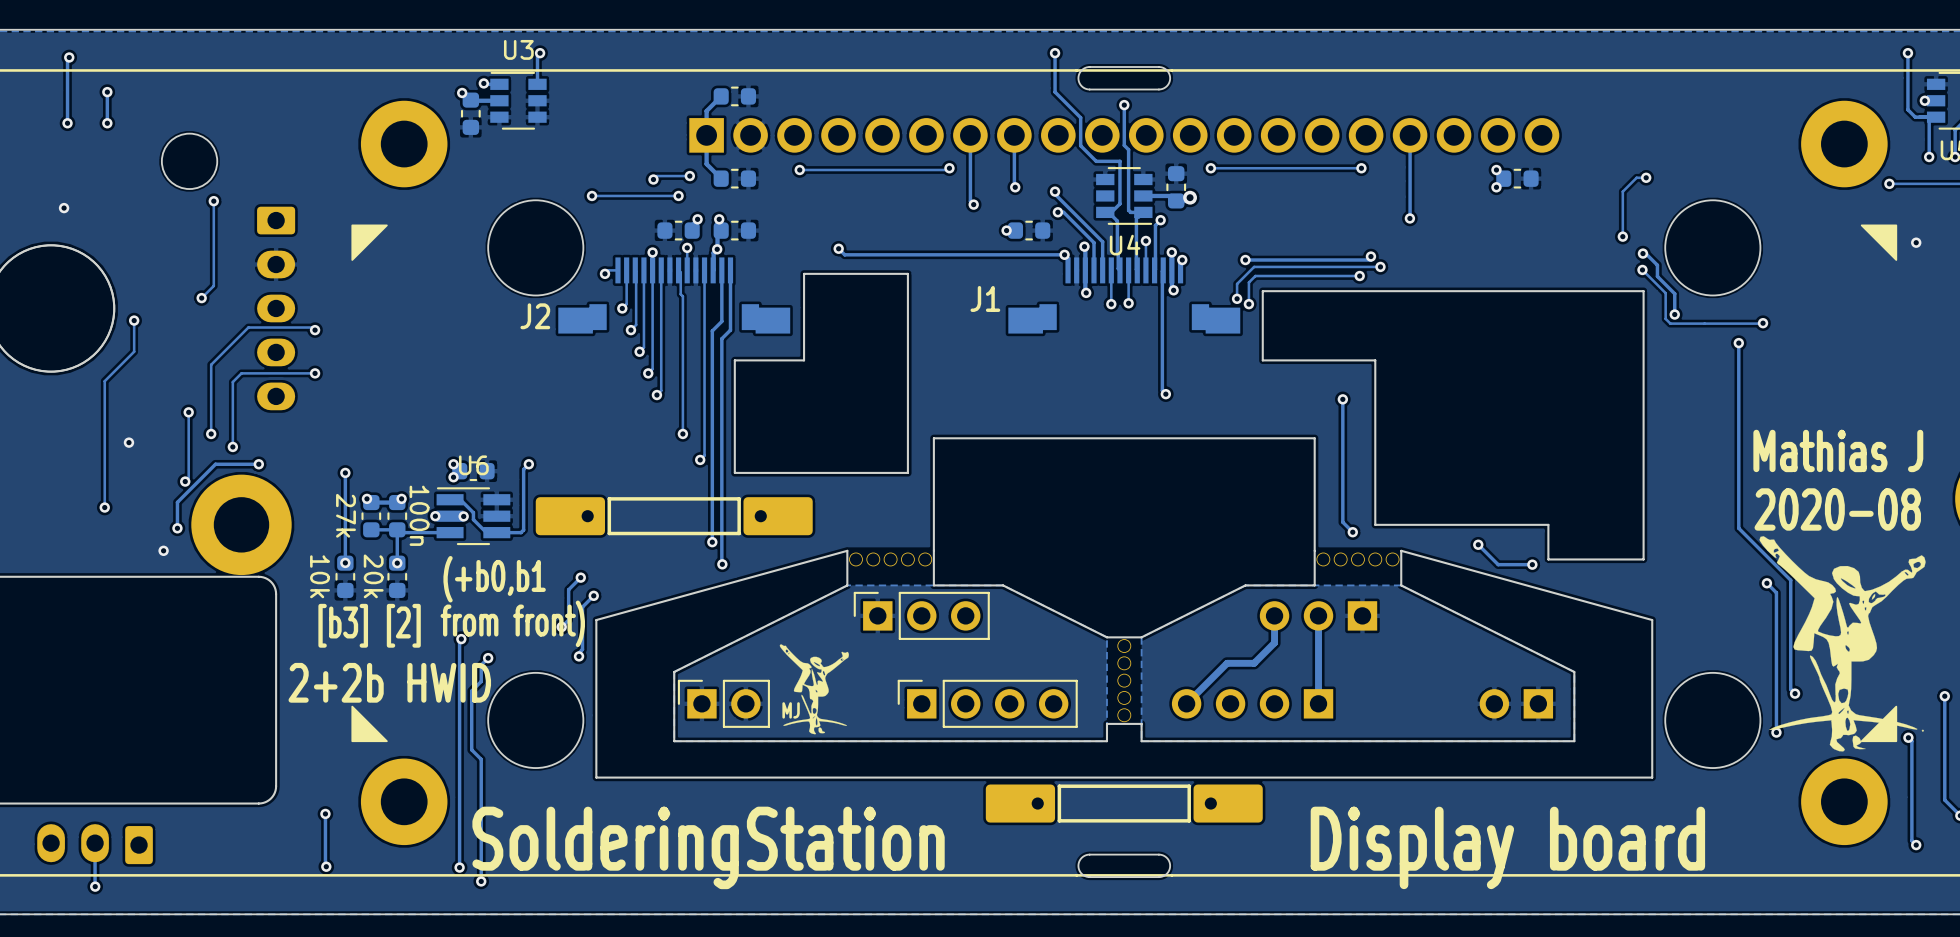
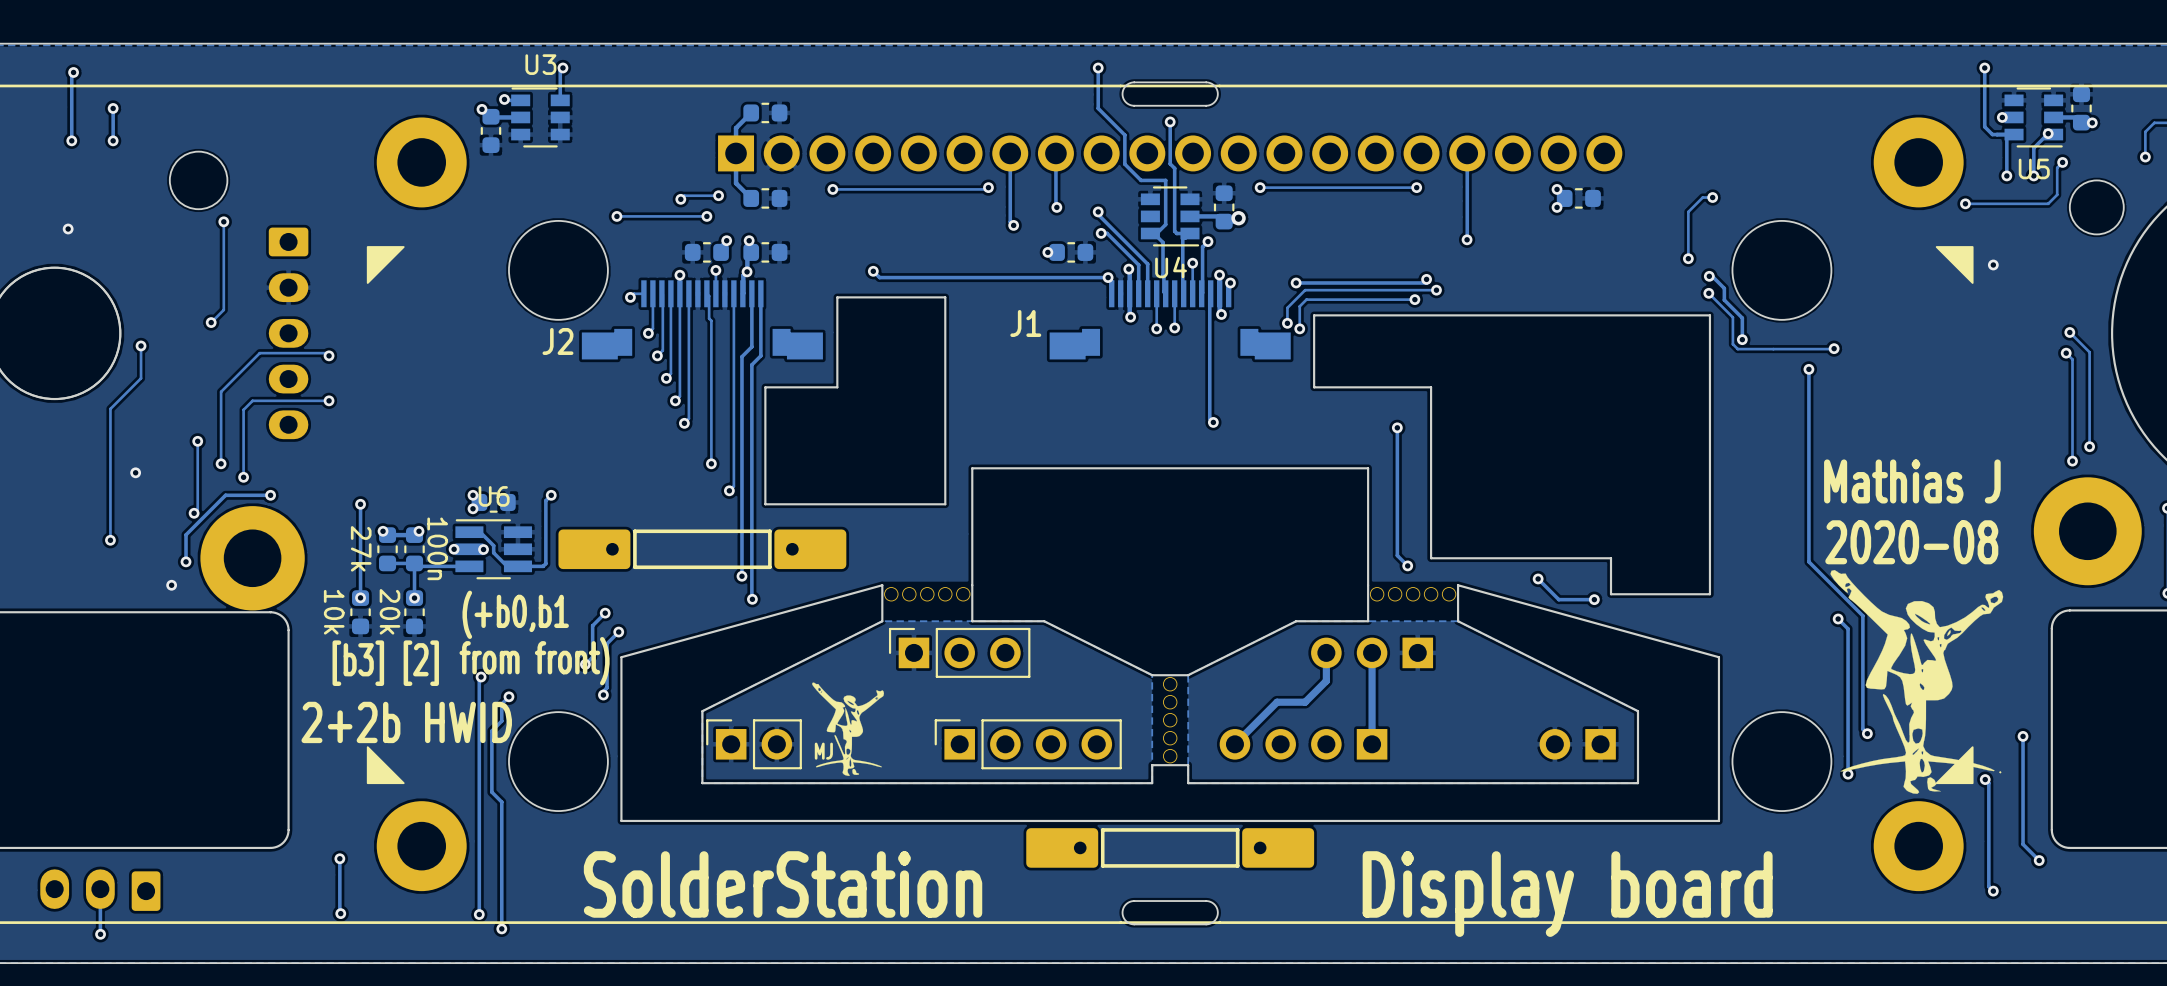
text: SolderingStation Display board (1088, 847) -> SolderStation Display board (1178, 894)

